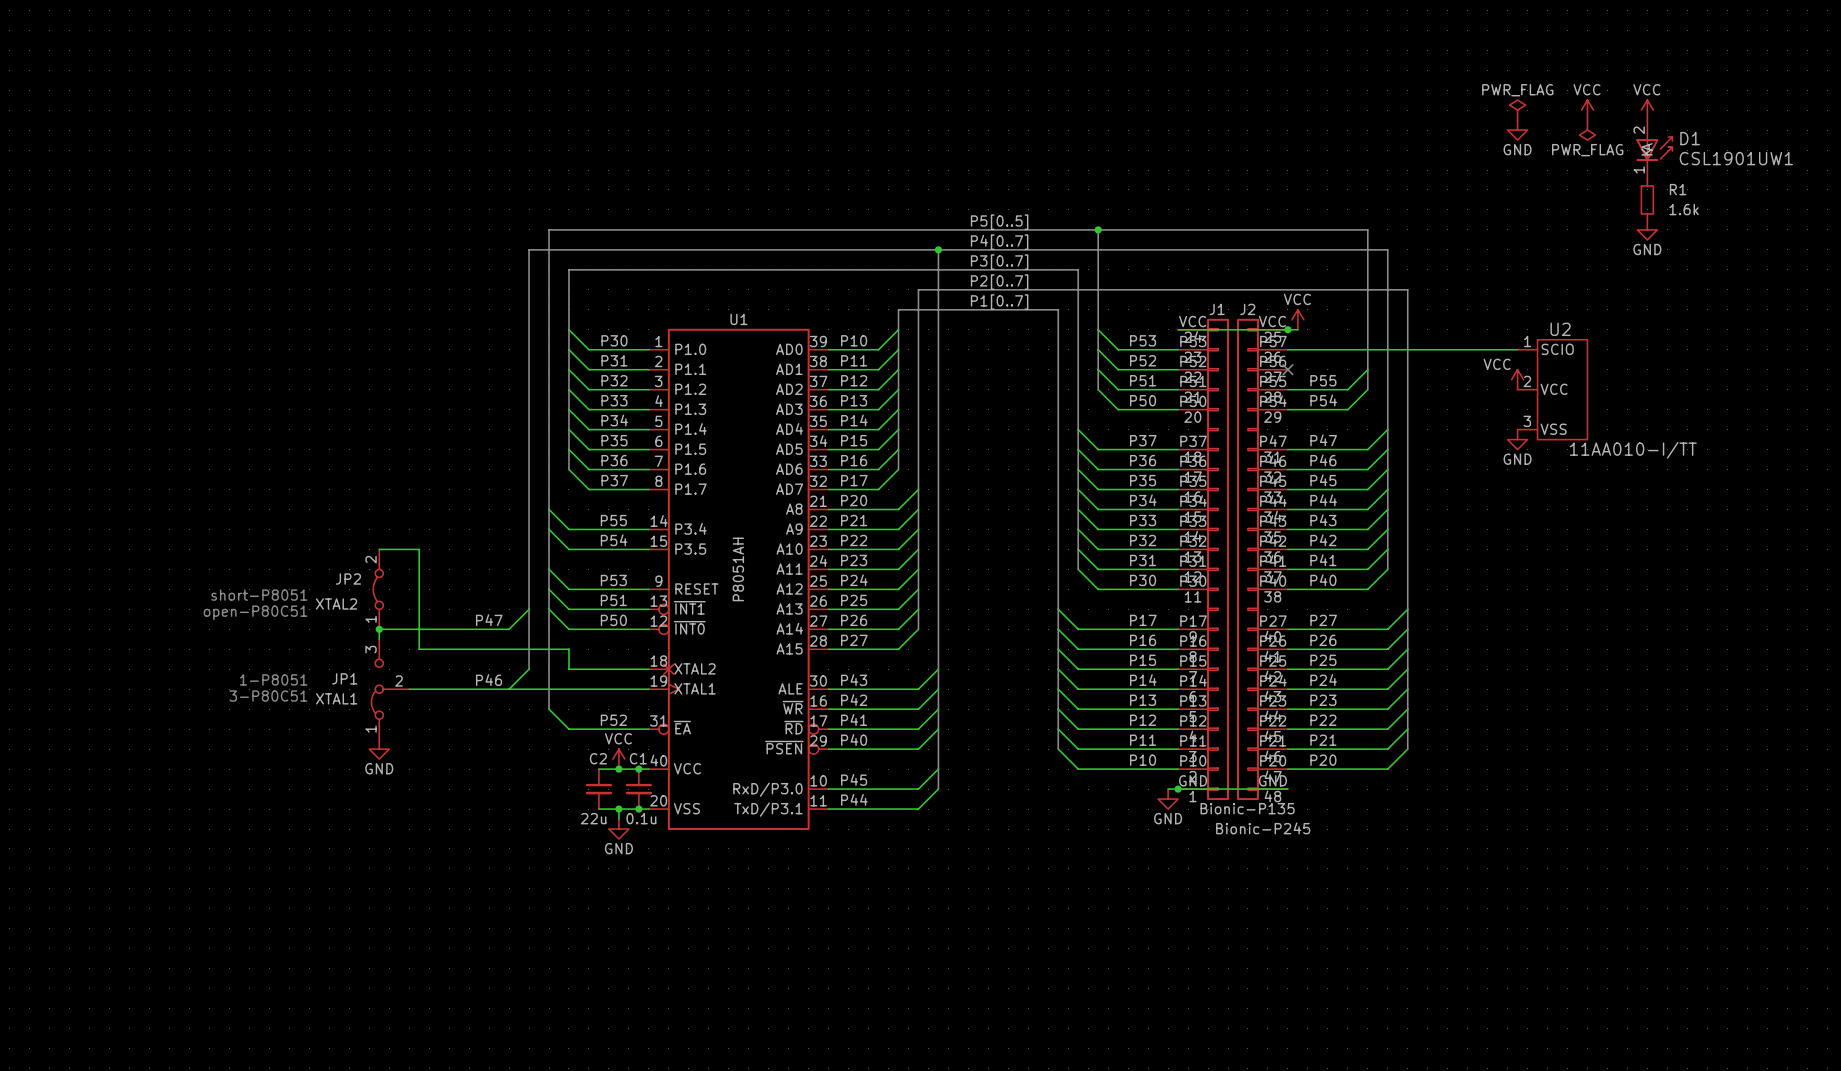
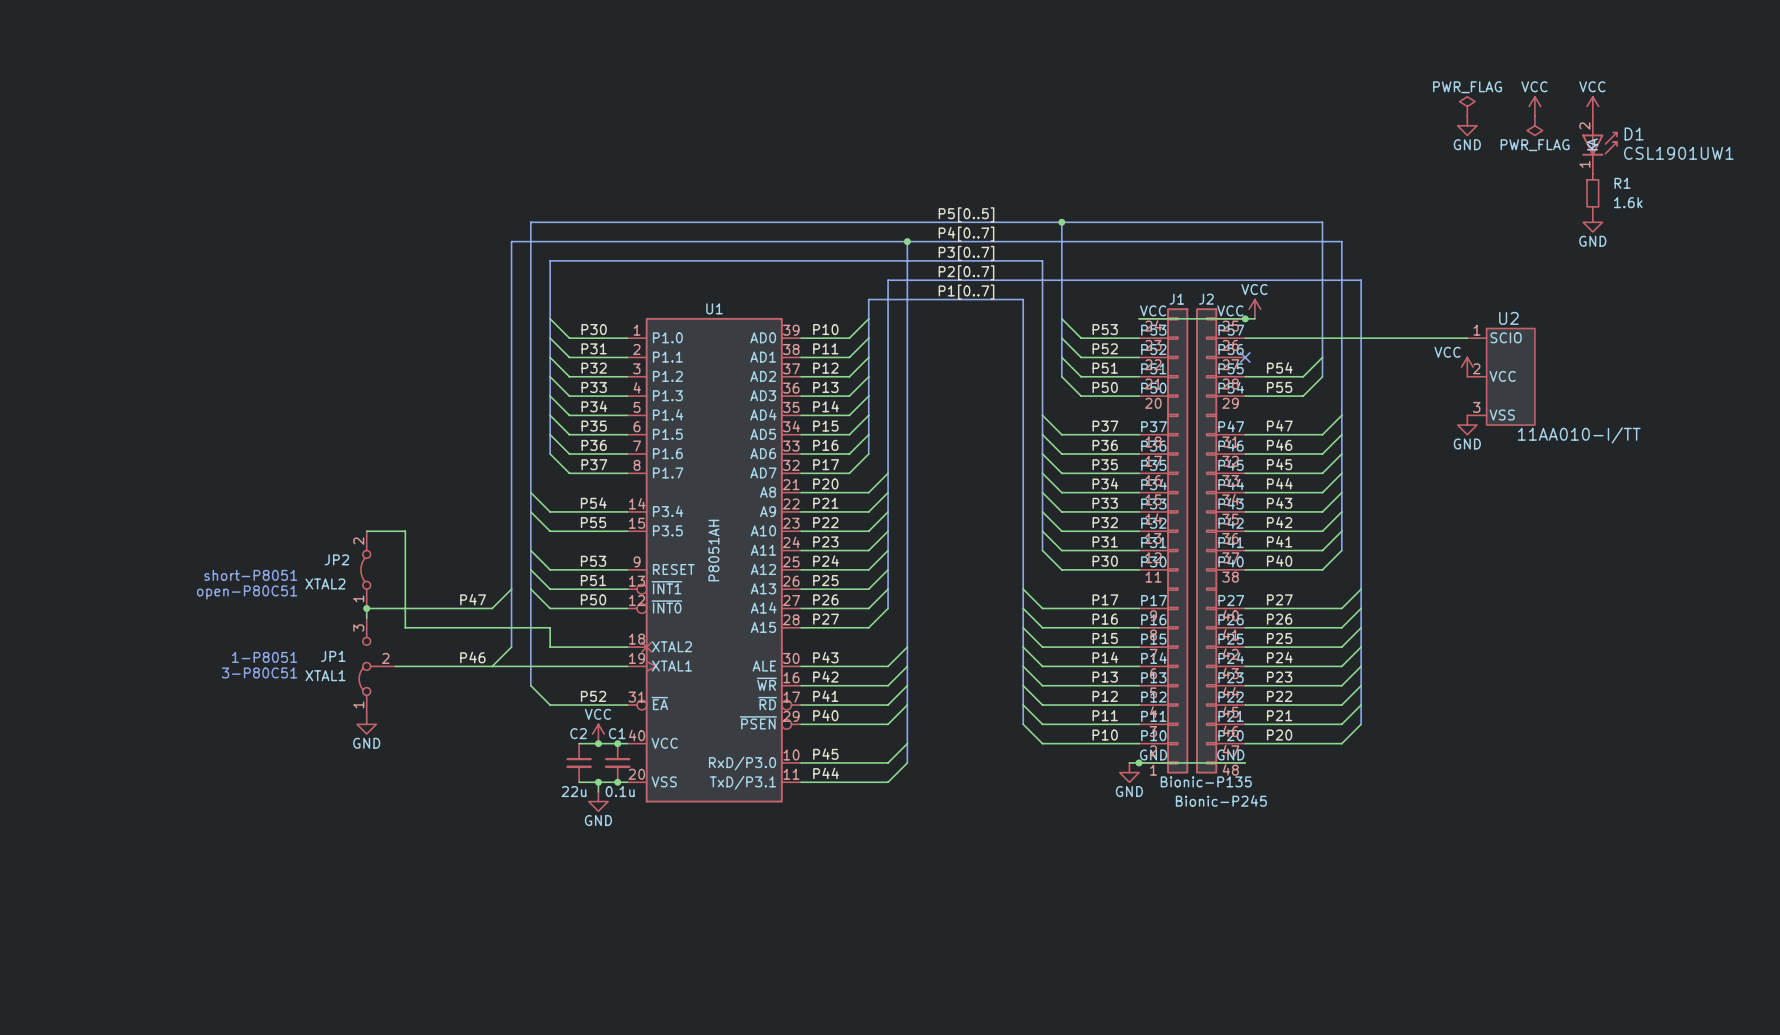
label: P55 (1323, 380) -> P54 (1279, 367)
label: P54 (1323, 400) -> P55 (1279, 387)
label: P55 (613, 520) -> P54 (593, 503)
label: P54 (614, 540) -> P55 (593, 522)

